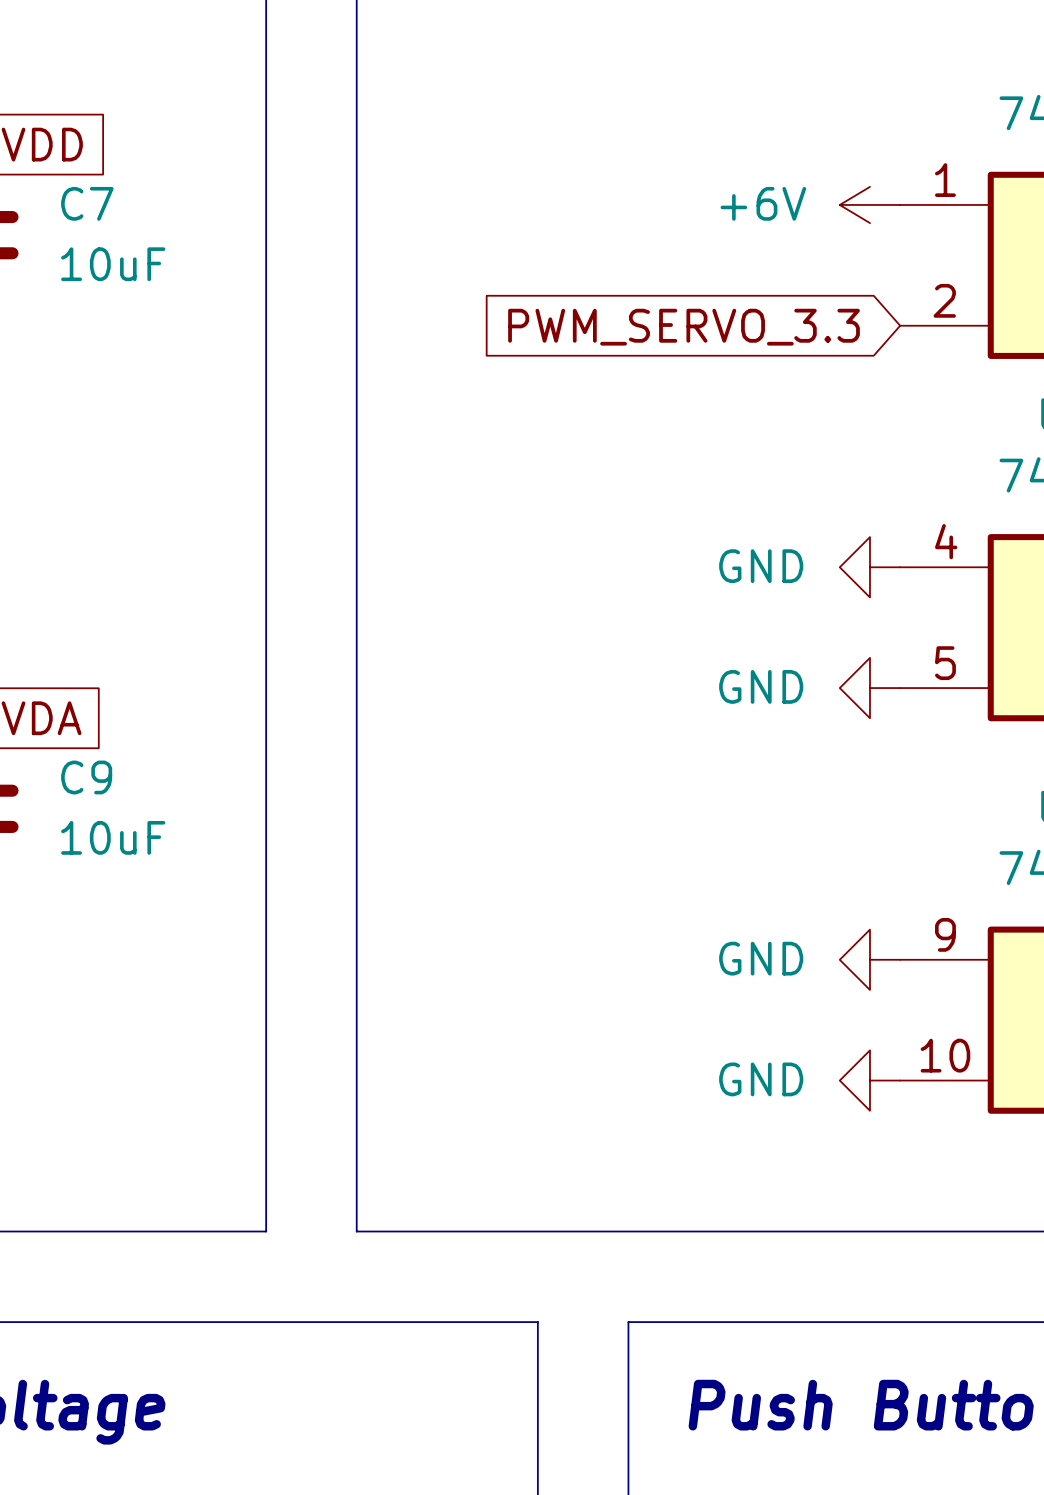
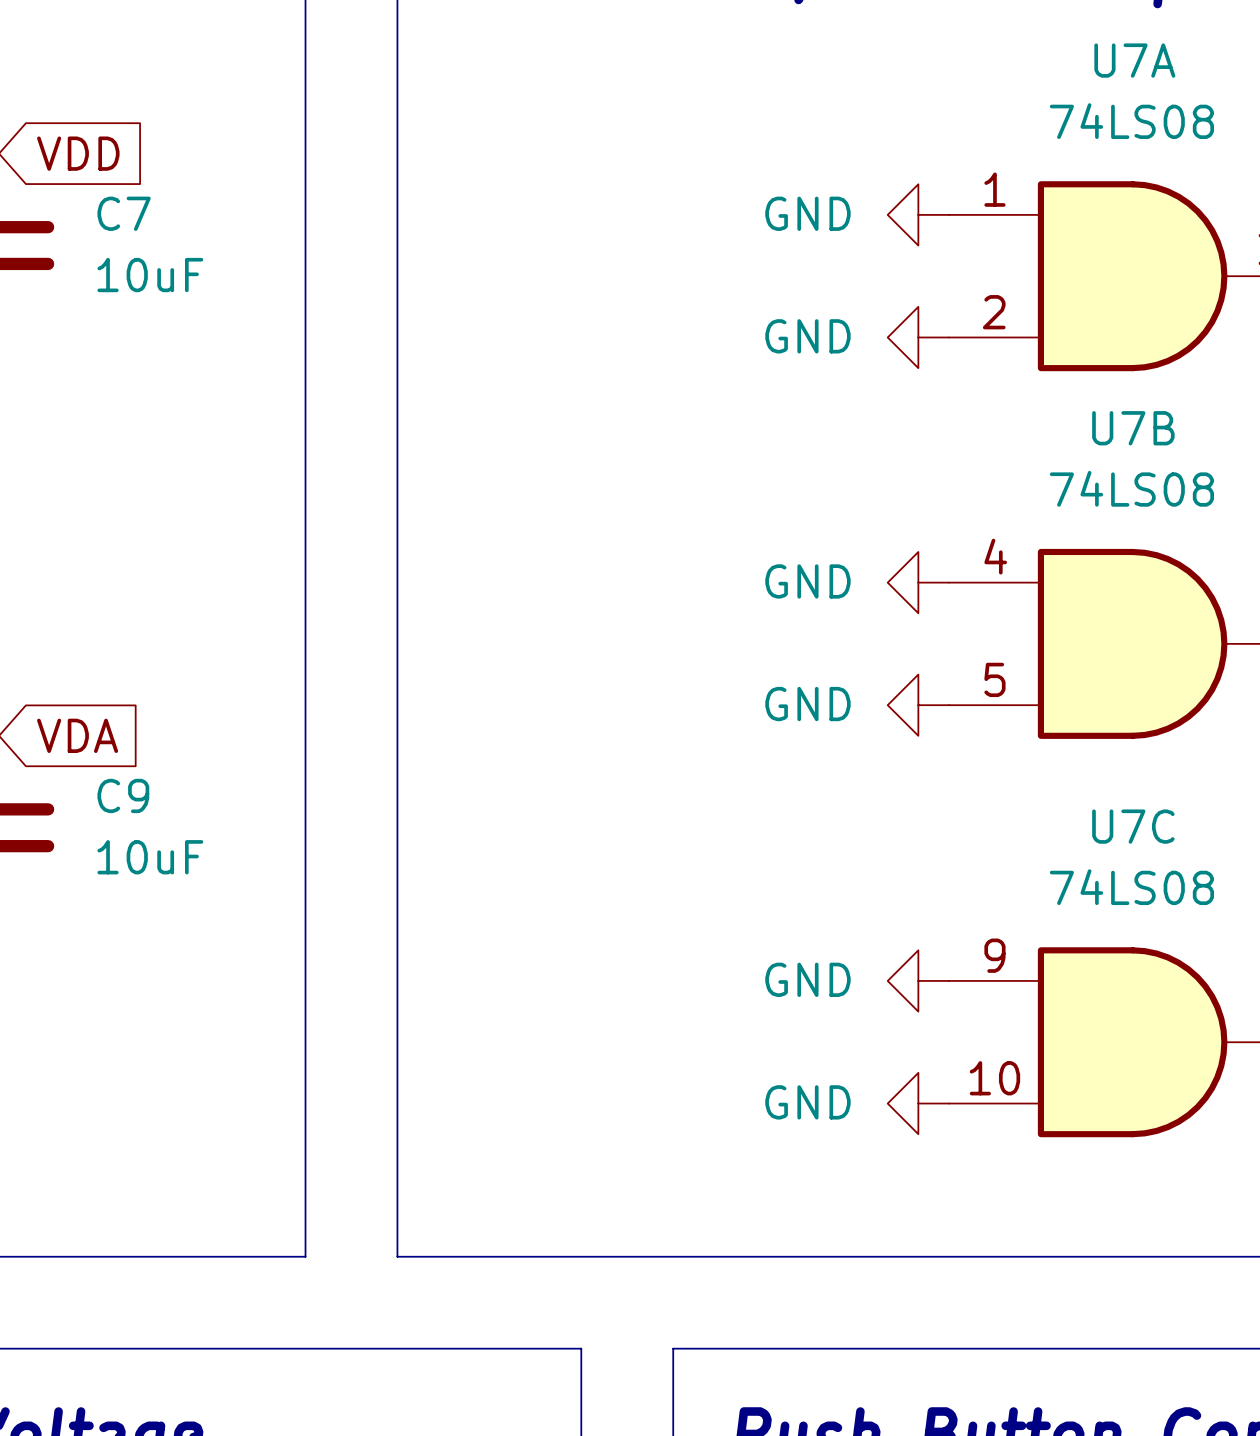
power symbol: +6V (869, 204) -> GND (918, 214)
power symbol: none -> GND (918, 337)
global label: PWM_SERVO_3.3 (684, 327) -> none

